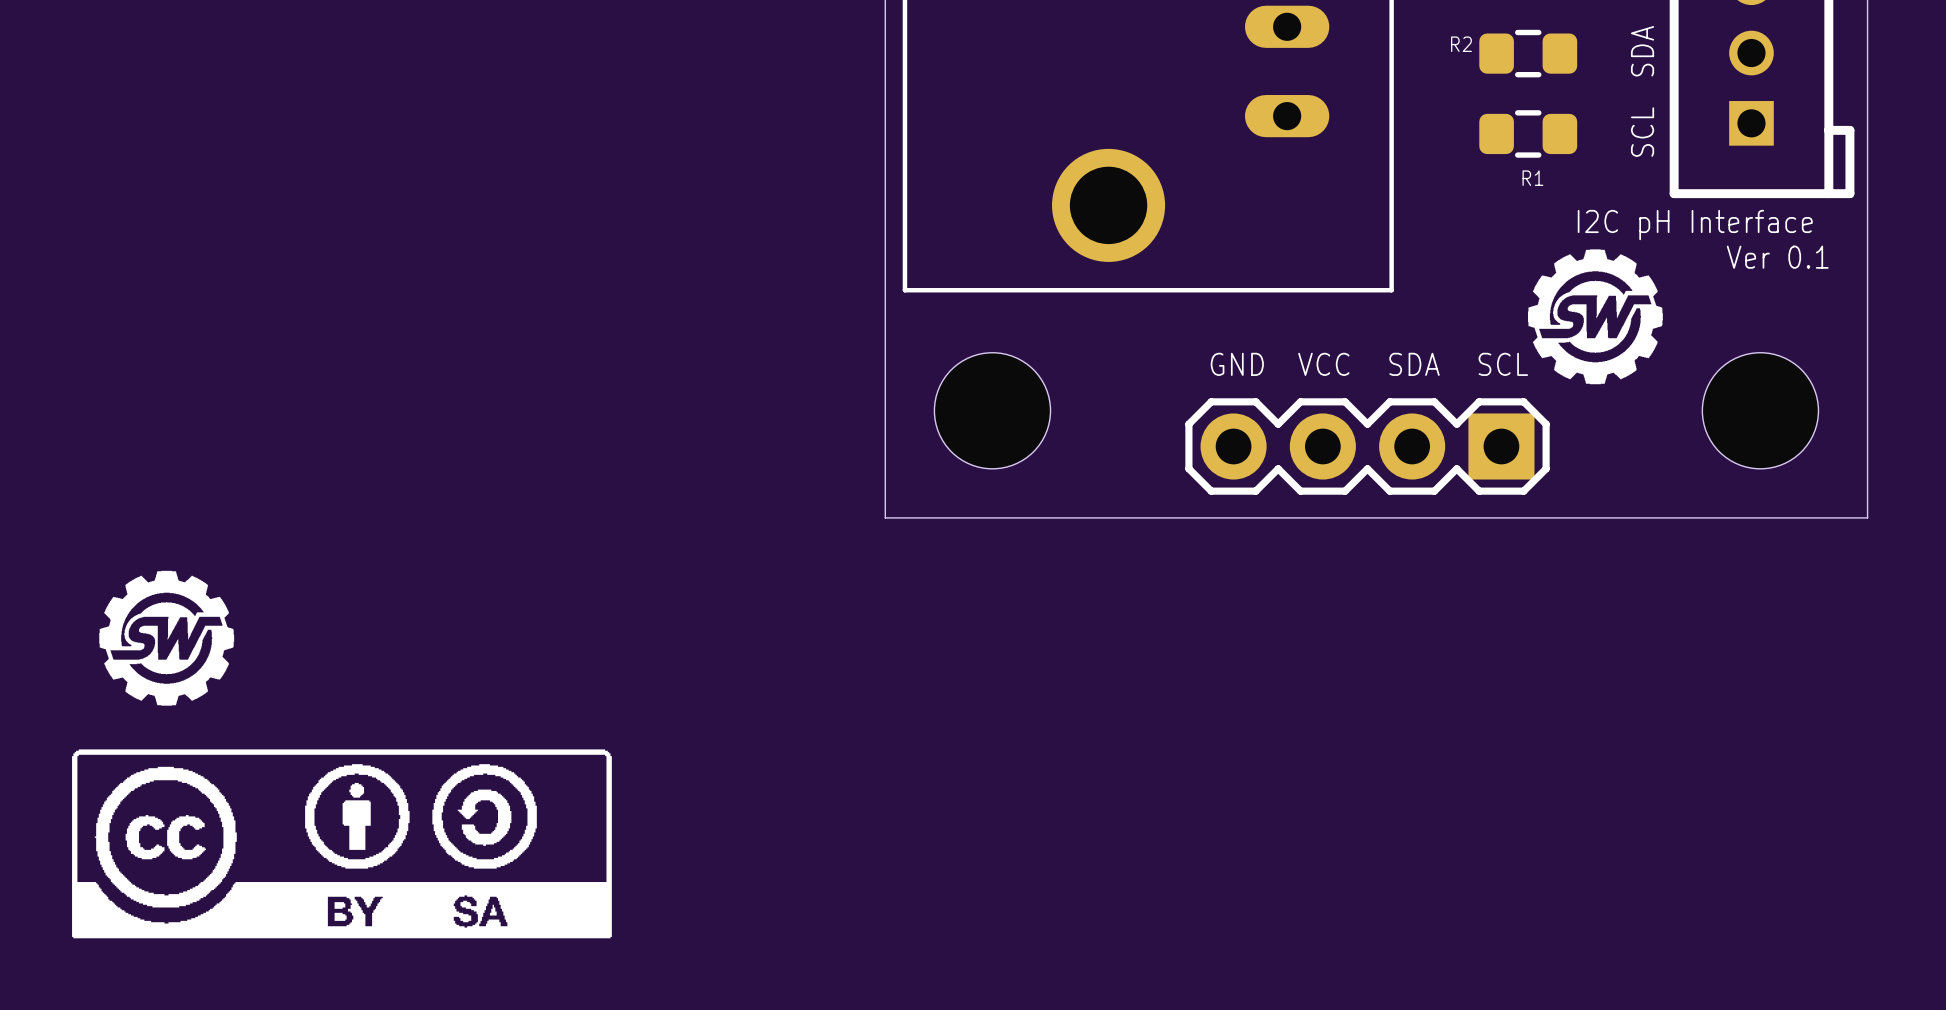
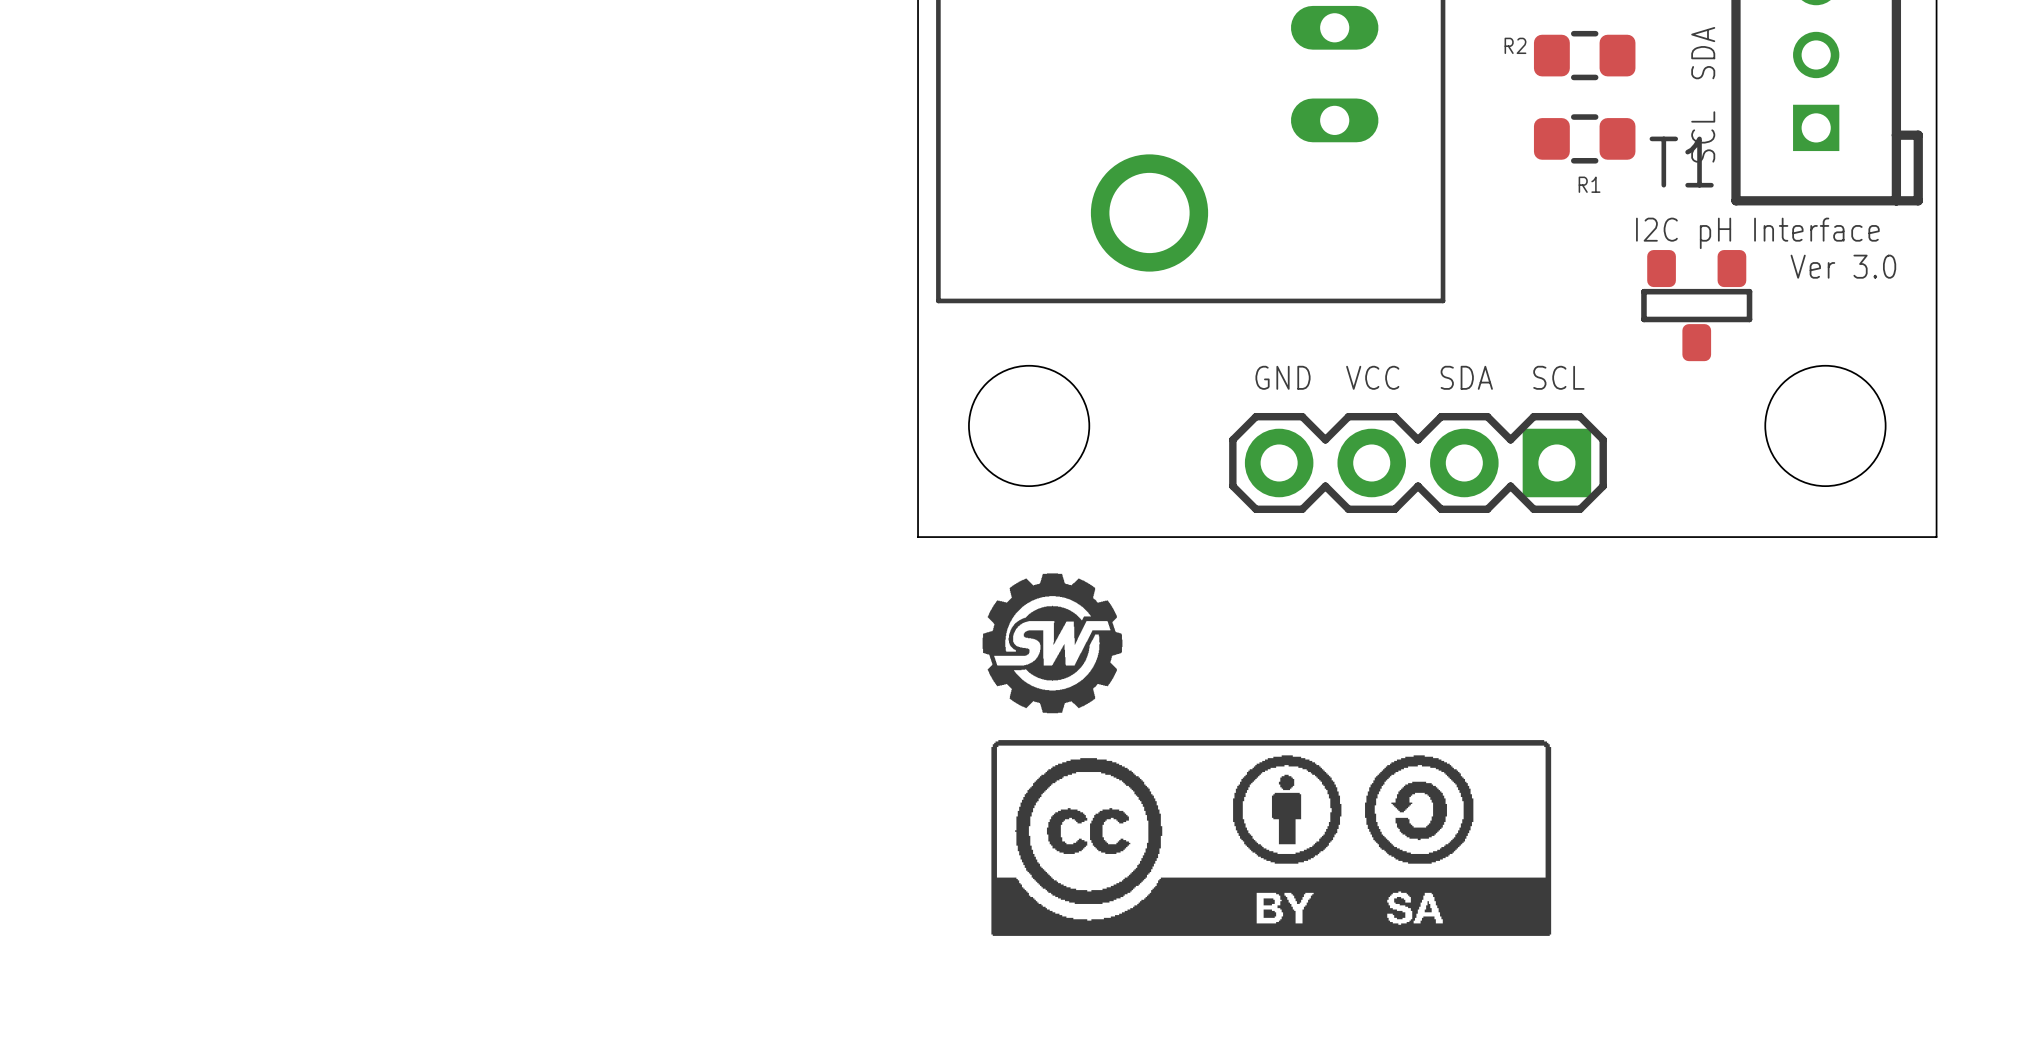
drawing: [1528, 249, 1663, 385] -> none
text: Ver 0.1 (1777, 257) -> Ver 3.0 (1843, 266)
T1: none -> (1696, 305)
drawing: none -> [982, 573, 1552, 936]
drawing: [99, 570, 235, 706] -> none
drawing: [72, 749, 612, 939] -> none

